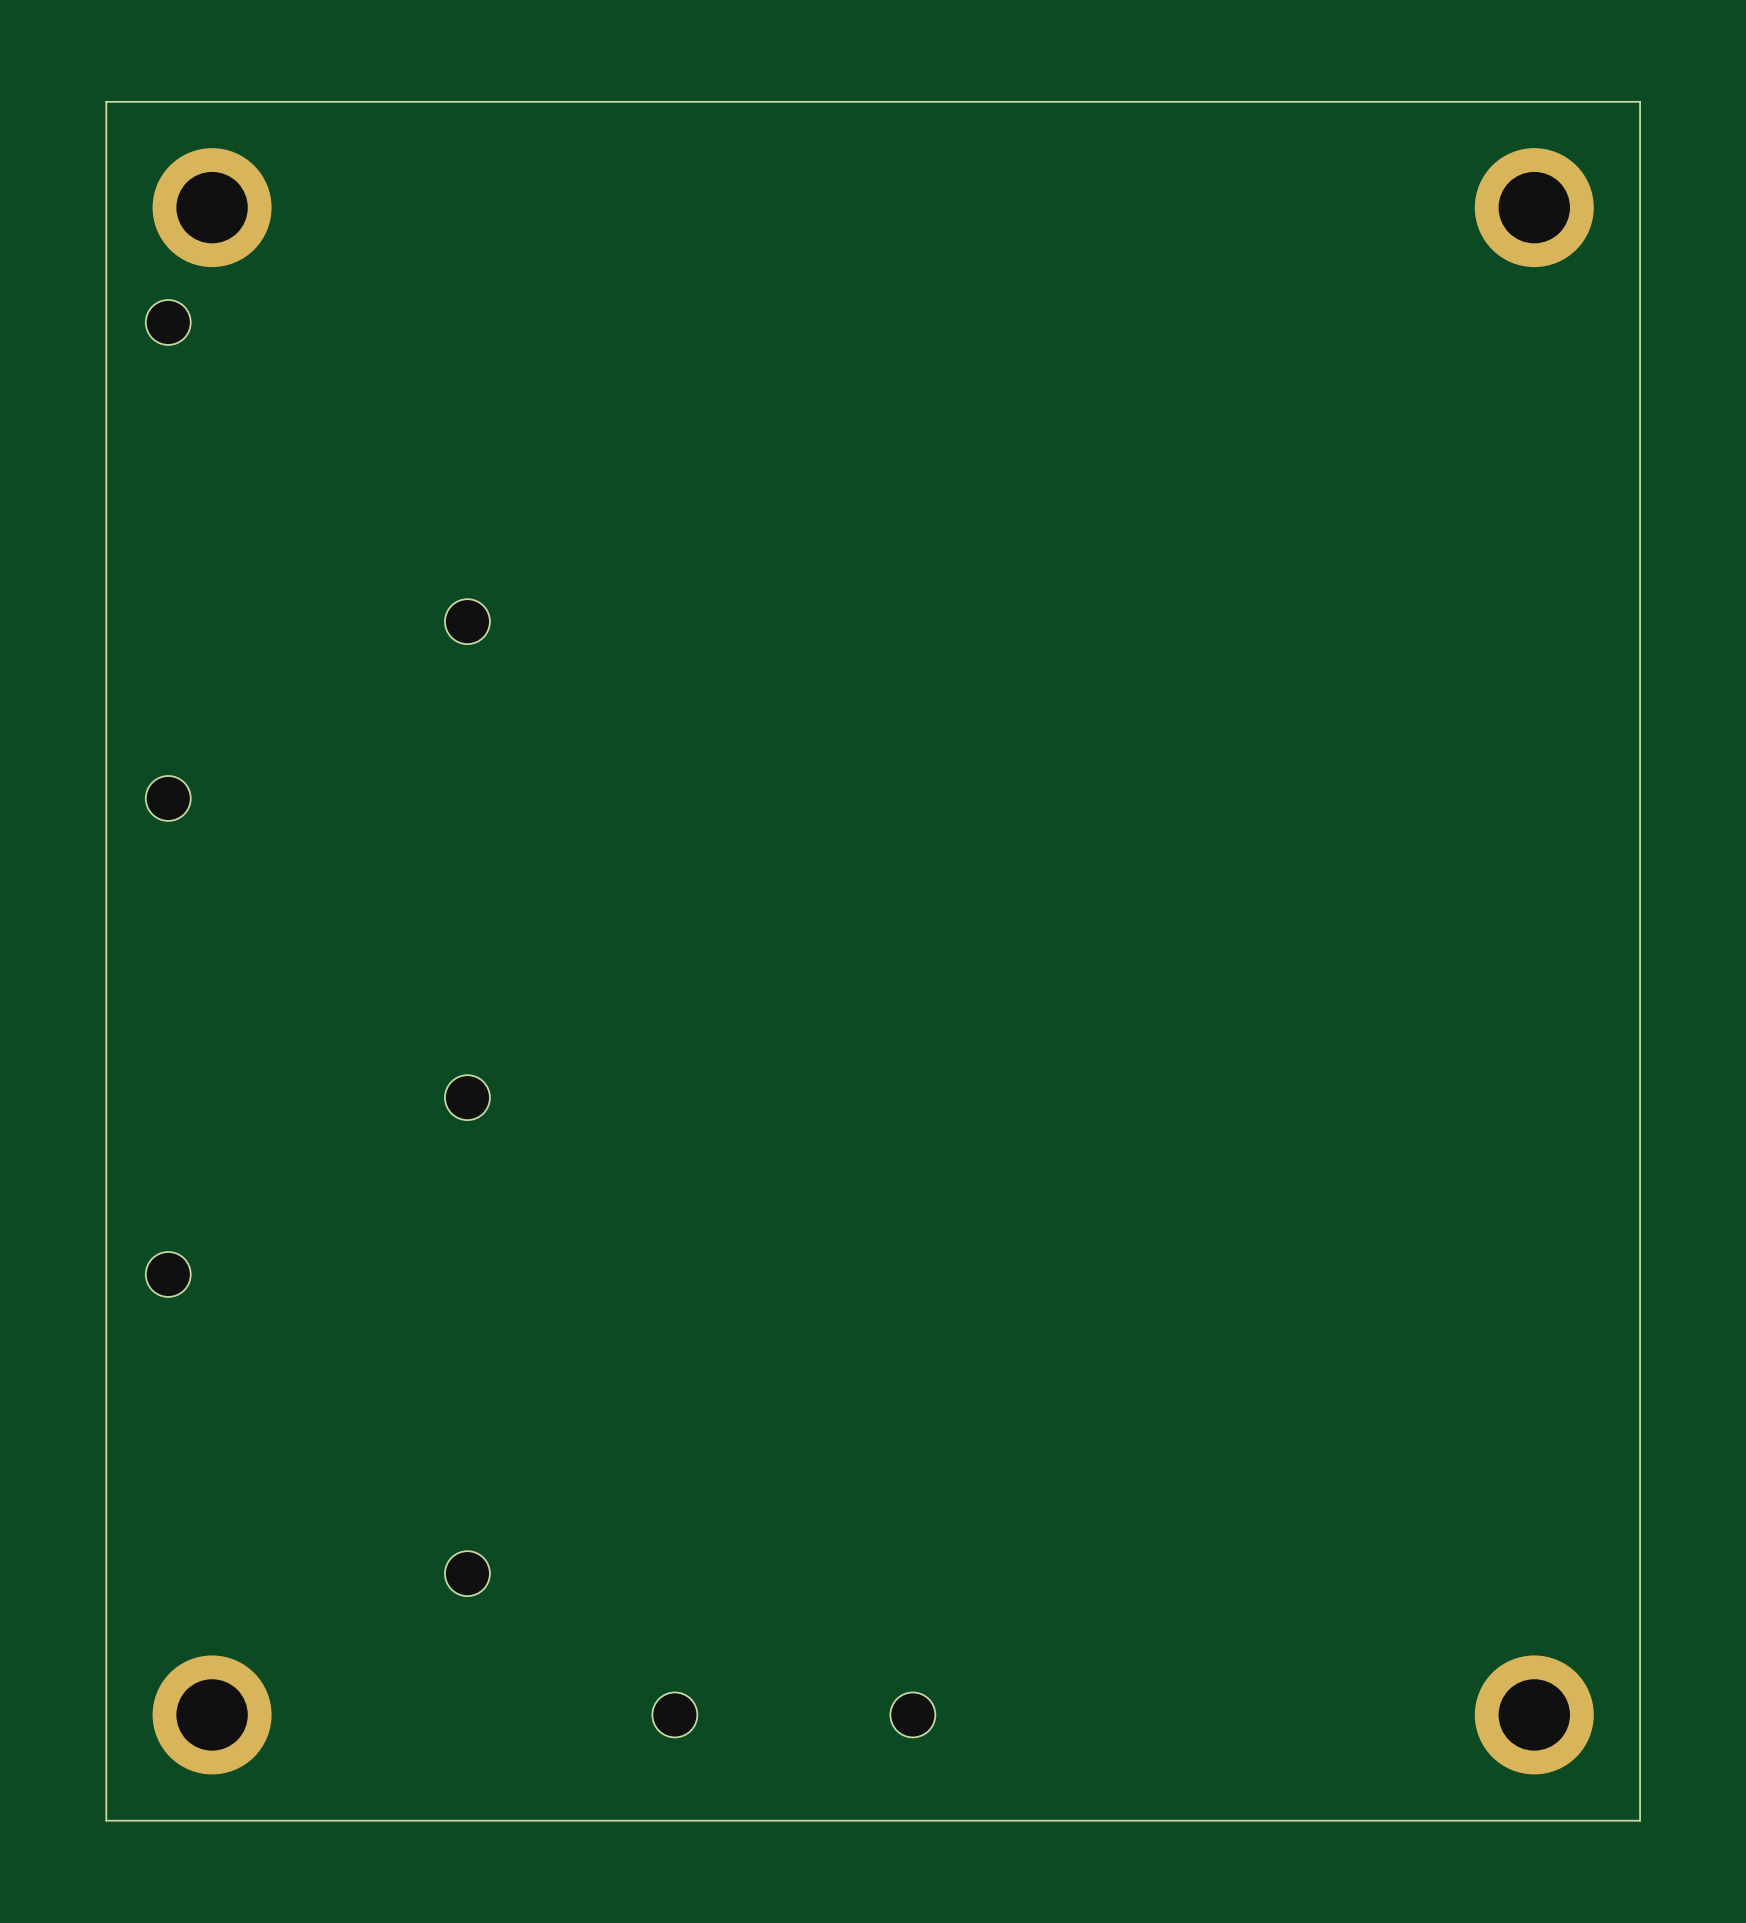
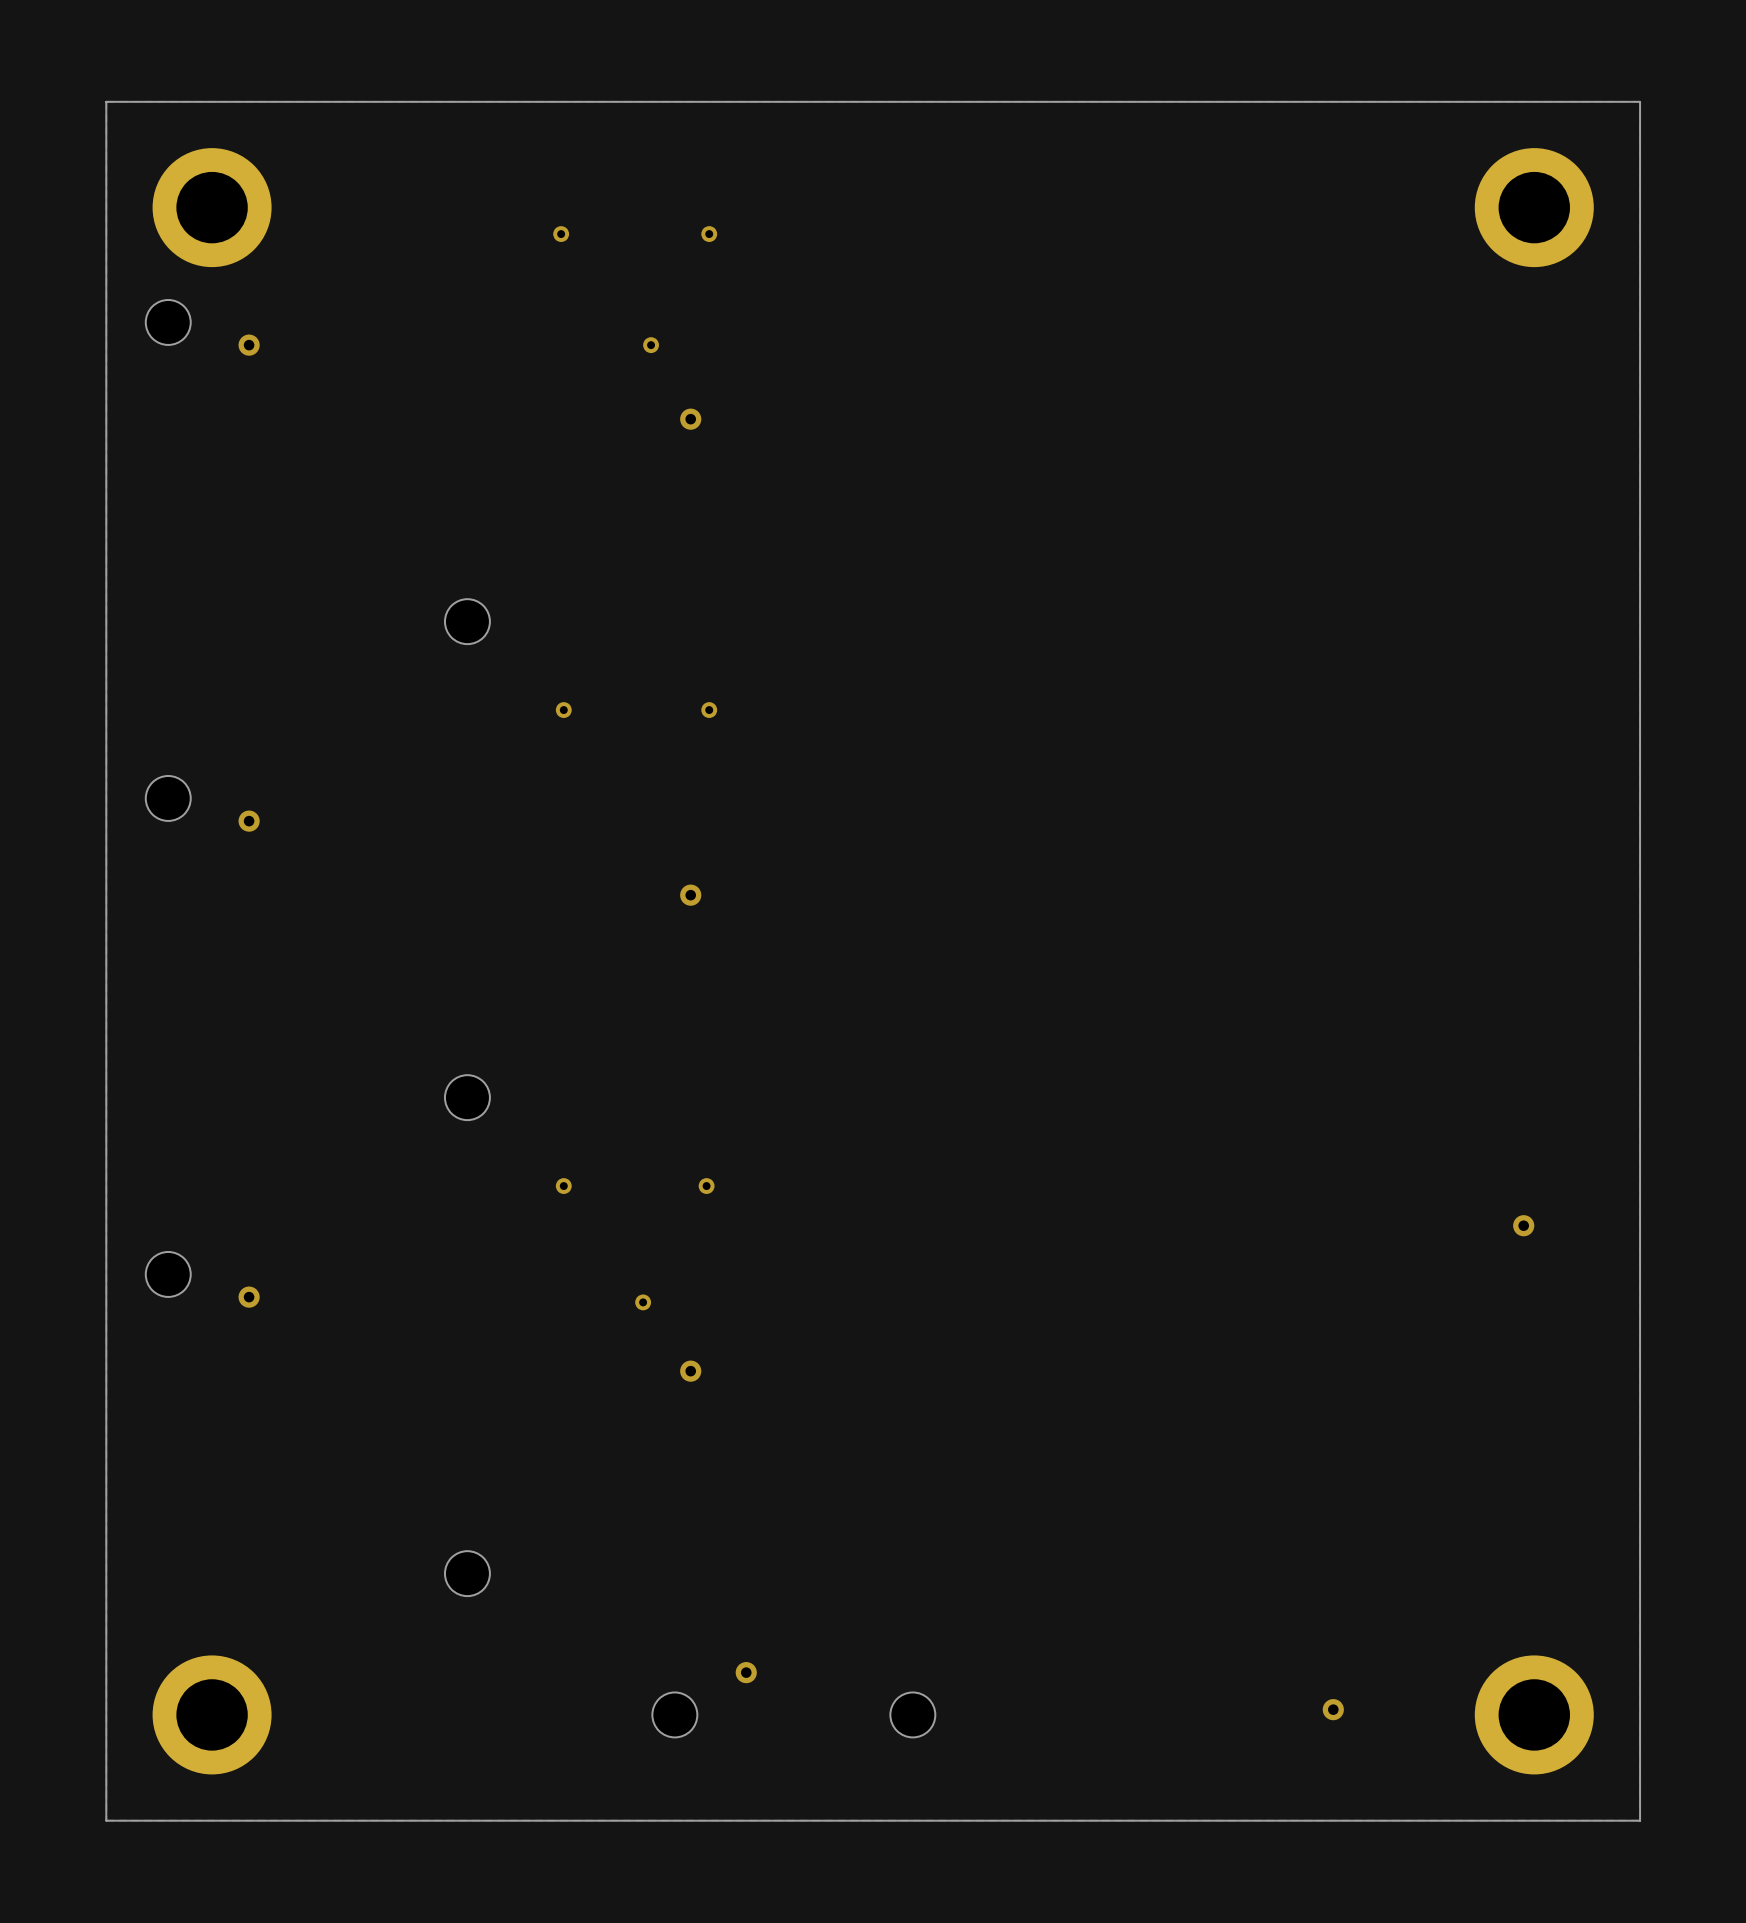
via: none -> (561, 234)
via: none -> (709, 234)
via: none -> (249, 345)
via: none -> (651, 345)
via: none -> (690, 419)
via: none -> (563, 710)
via: none -> (709, 710)
via: none -> (249, 821)
via: none -> (690, 895)
via: none -> (563, 1186)
via: none -> (706, 1186)
via: none -> (1523, 1225)
via: none -> (249, 1297)
via: none -> (643, 1302)
via: none -> (690, 1371)
via: none -> (746, 1672)
via: none -> (1333, 1709)

